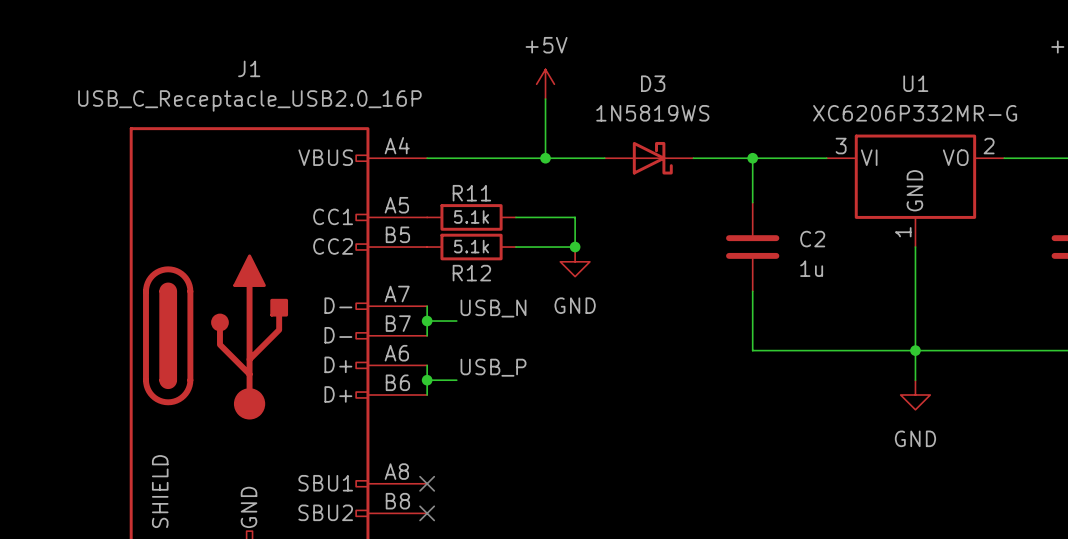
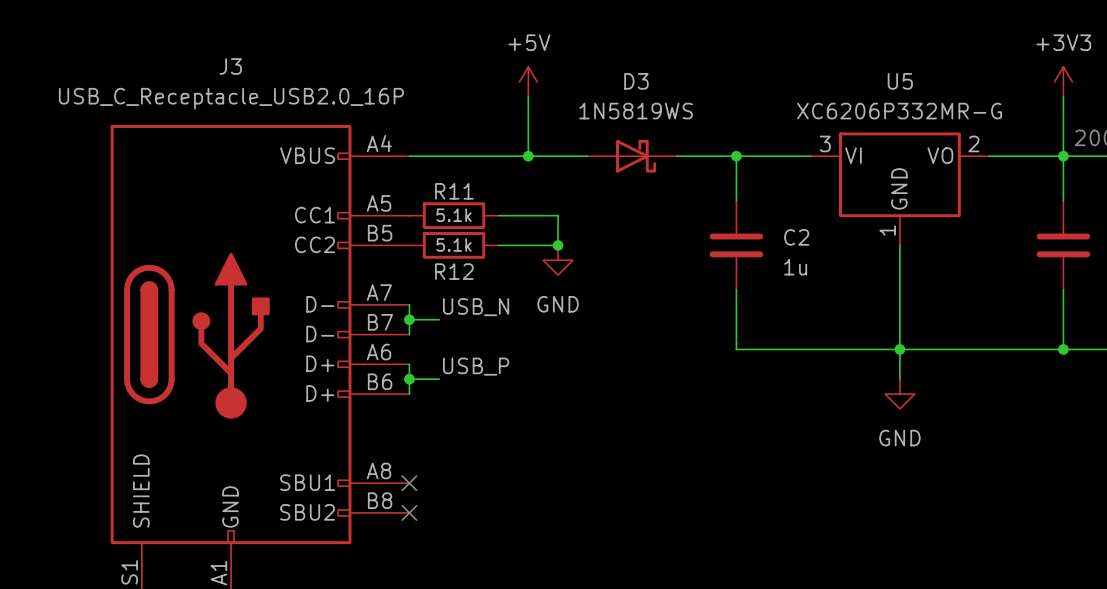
J1 name: J1 (249, 68) -> J3 (230, 66)
U1 name: U1 (915, 83) -> U5 (900, 81)

